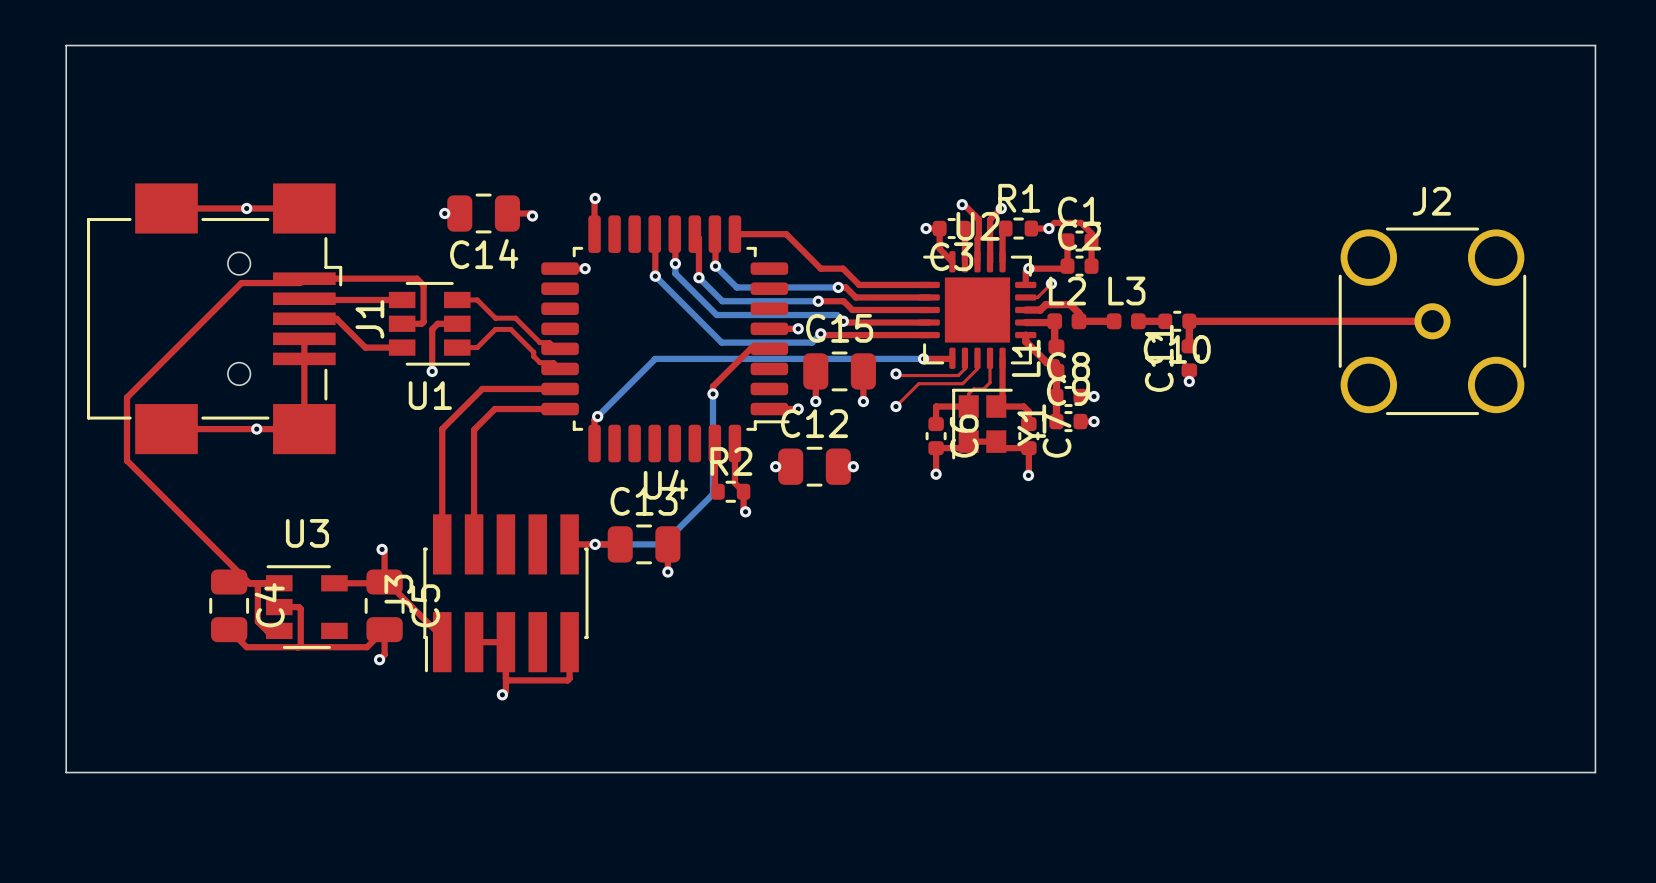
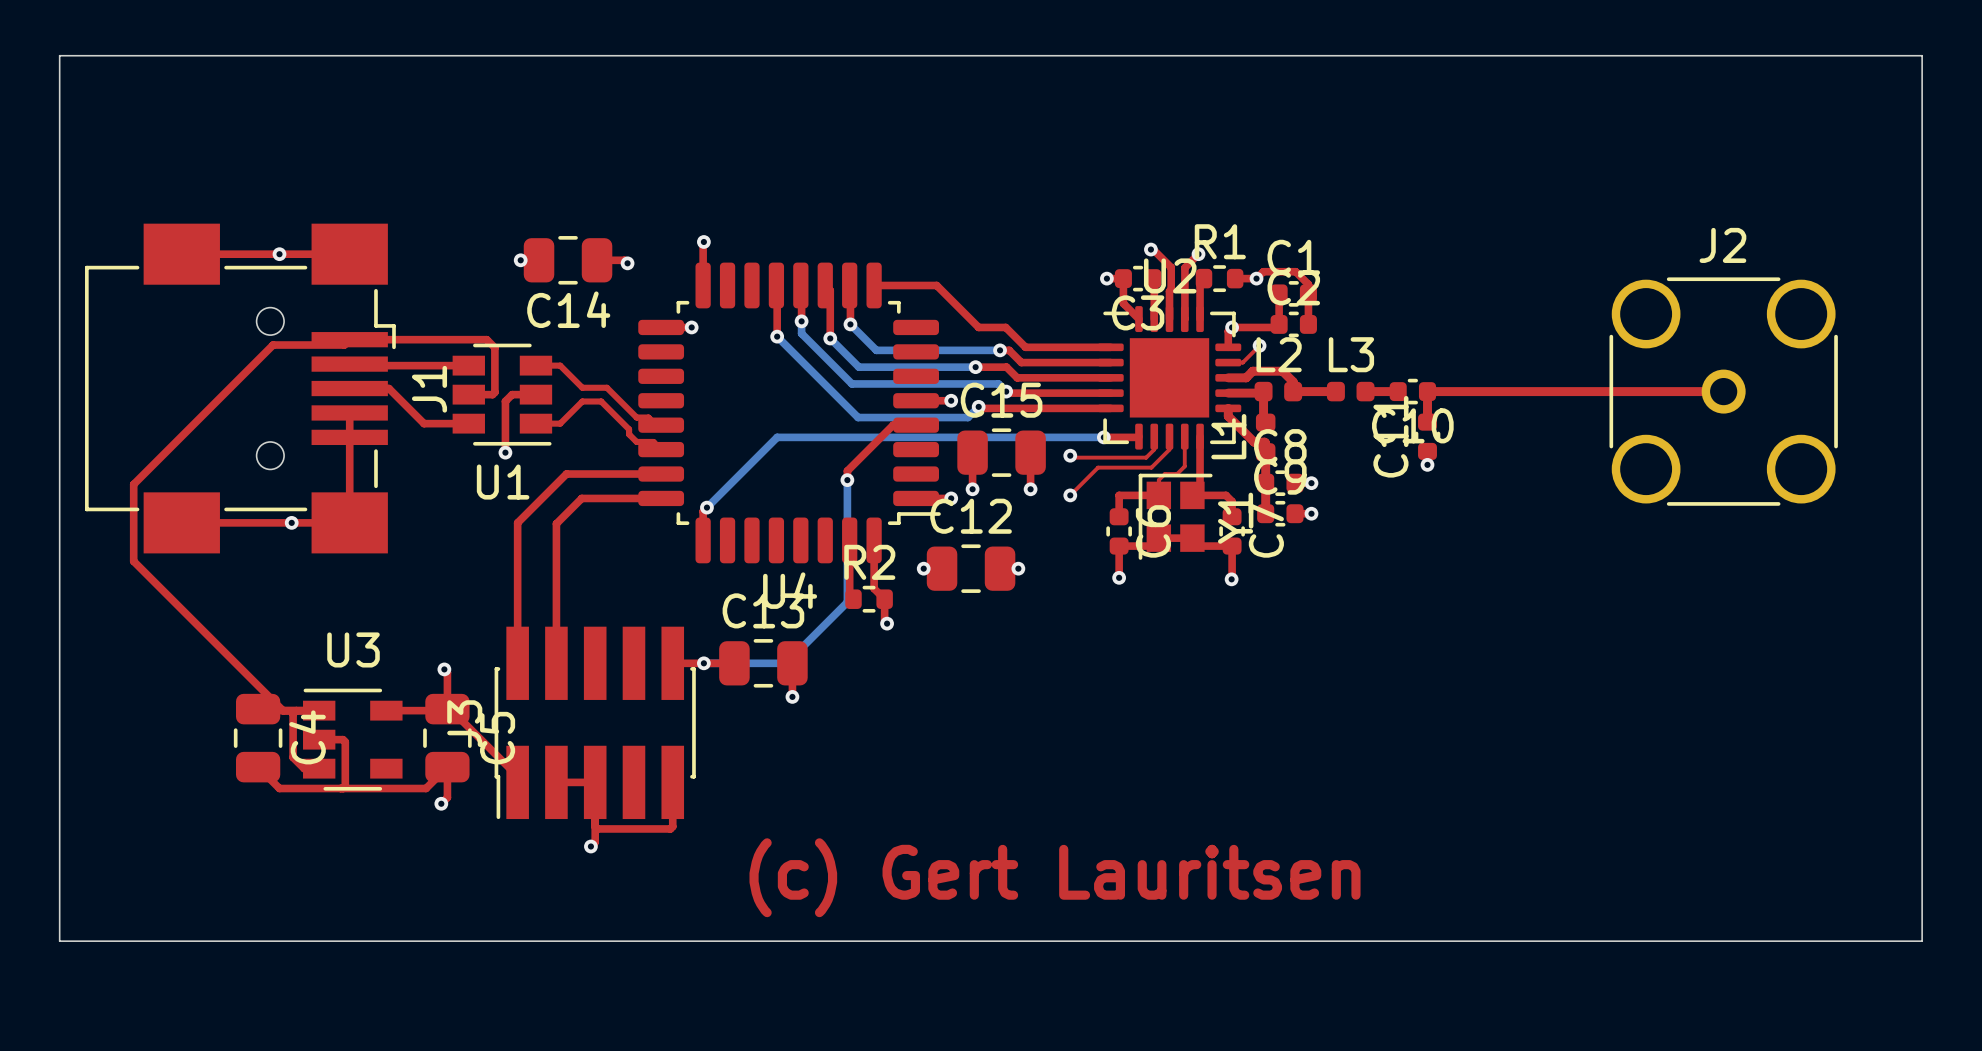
text: none -> (c) Gert Lauritsen (1055, 877)

